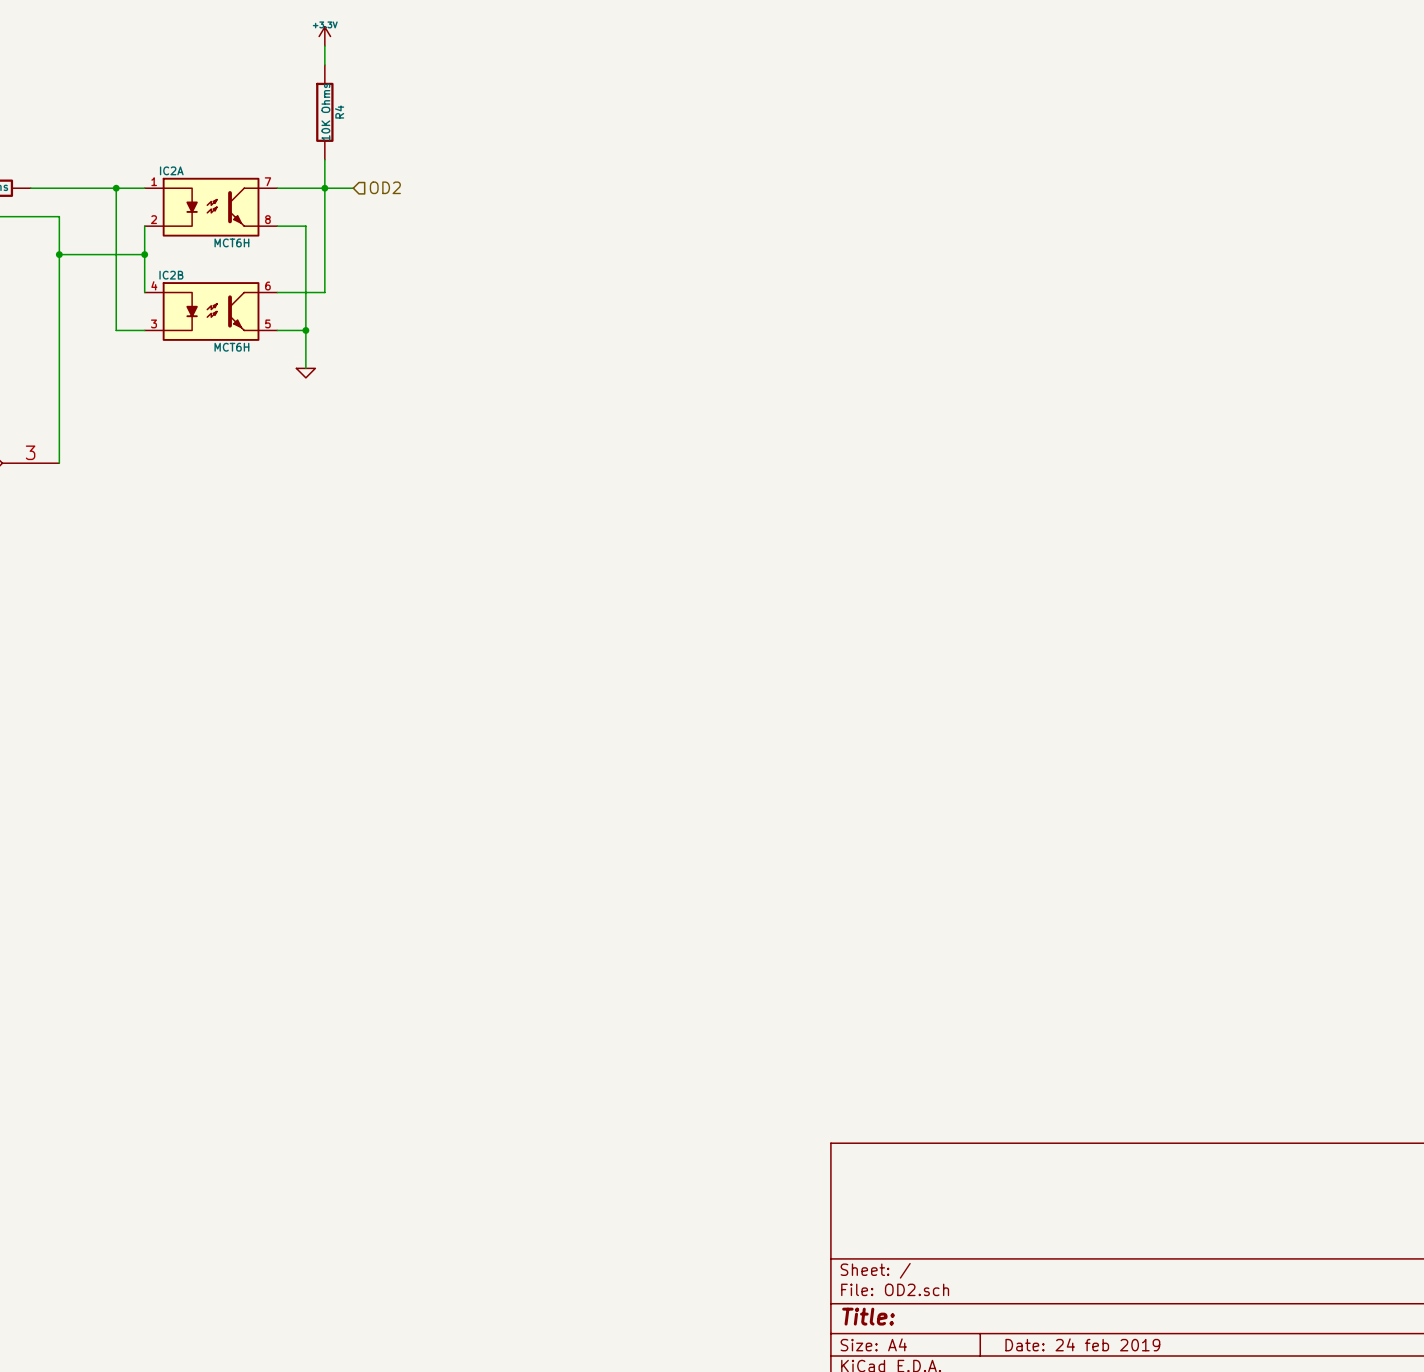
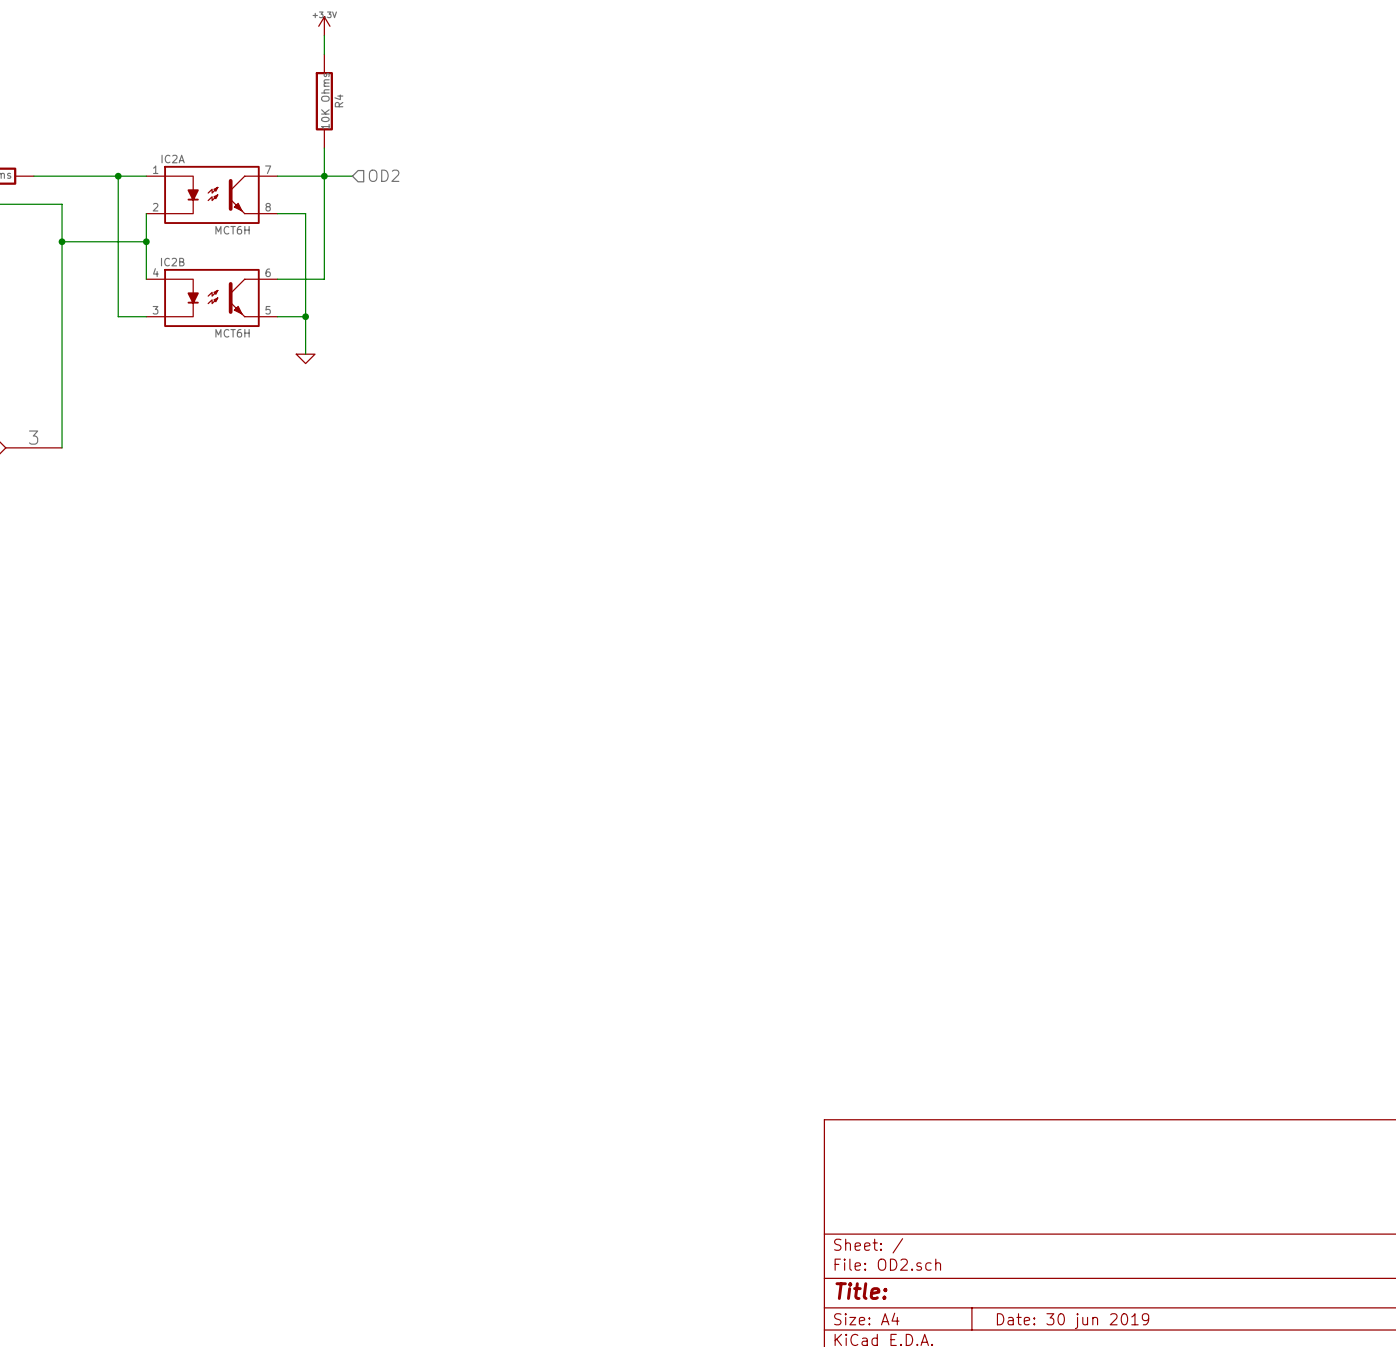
title block: Date: 24 feb 2019 (1082, 1344) -> Date: 30 jun 2019 (1073, 1321)

